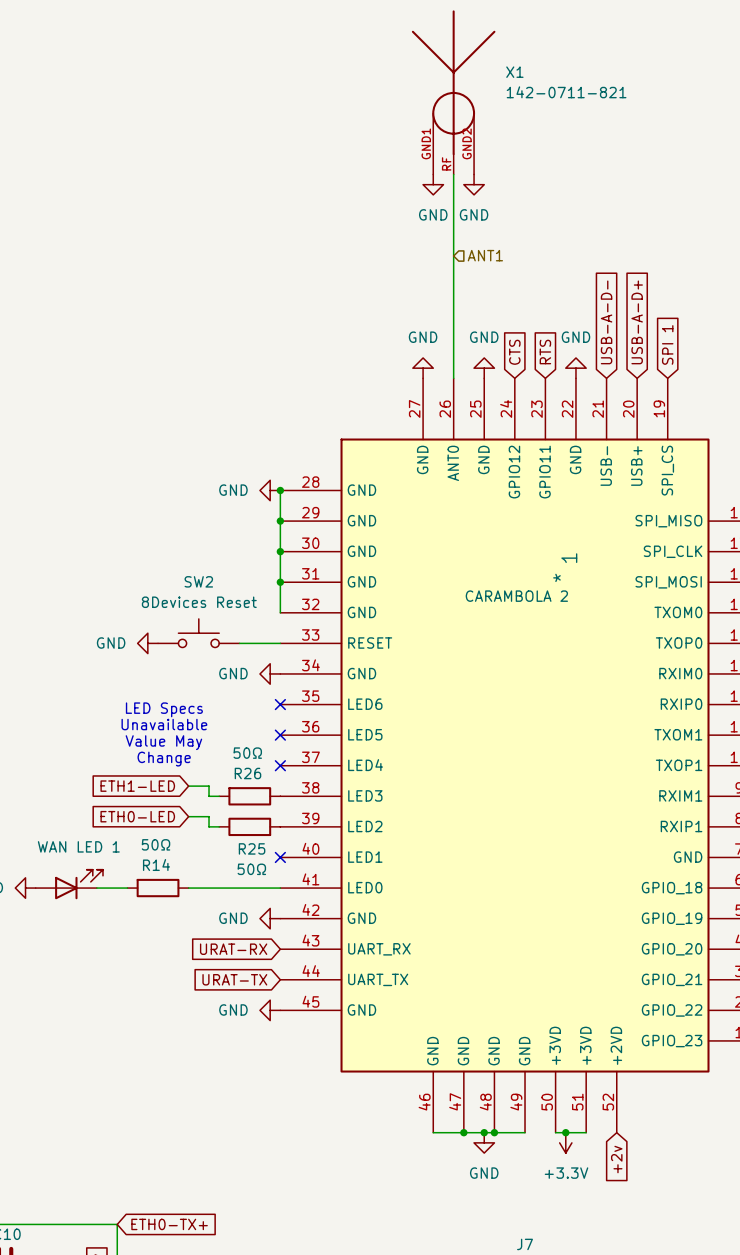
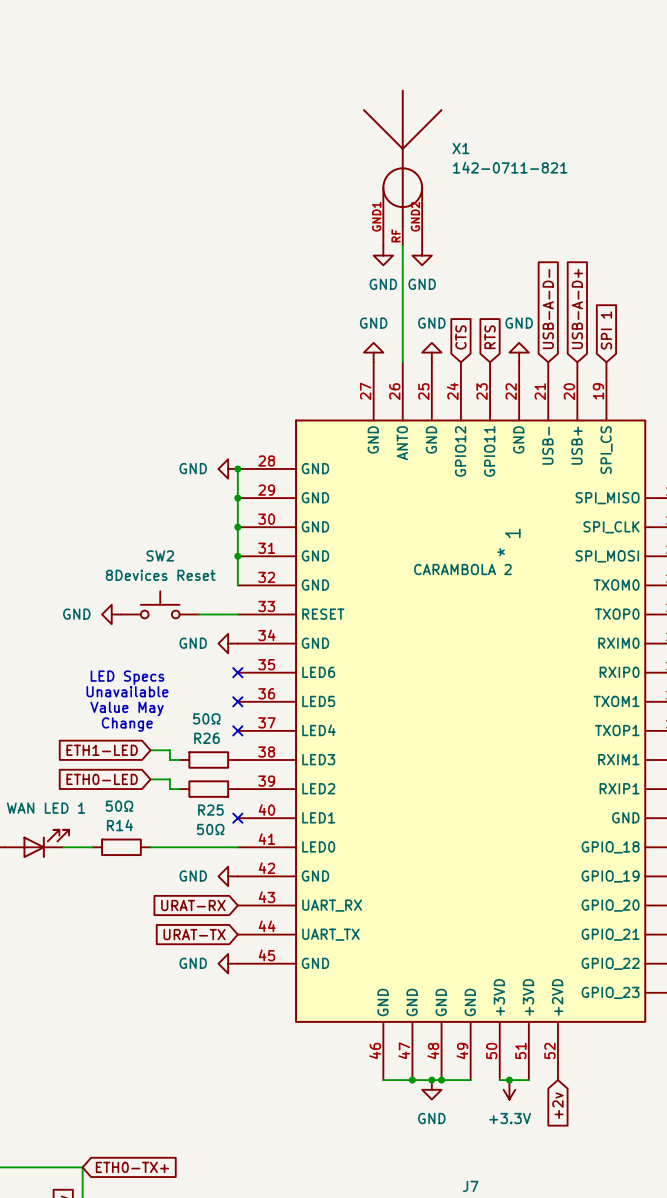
X1 position: (453, 92) -> (402, 167)
power symbol: GND (433, 184) -> none
power symbol: GND (474, 184) -> none
hierarchical label: ANT1 (485, 255) -> none
power symbol: none -> GND (383, 255)
power symbol: none -> GND (422, 255)

